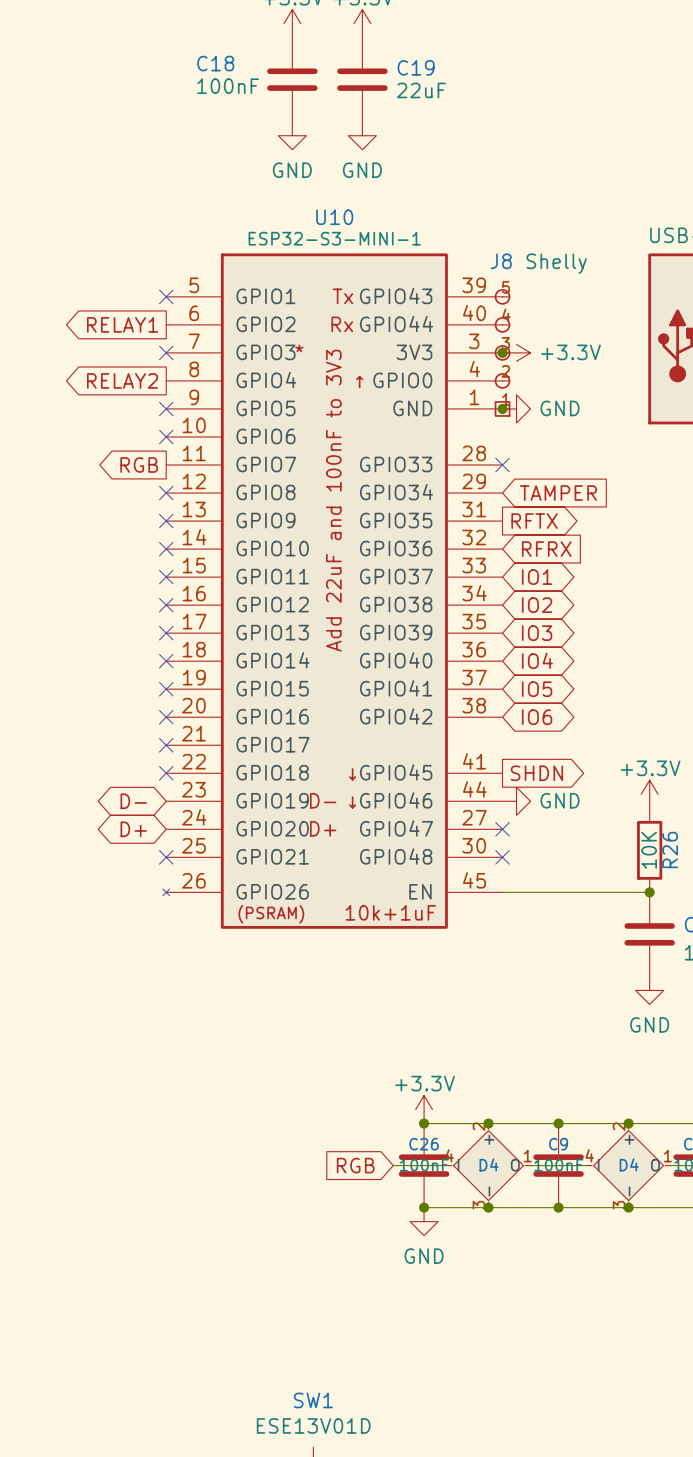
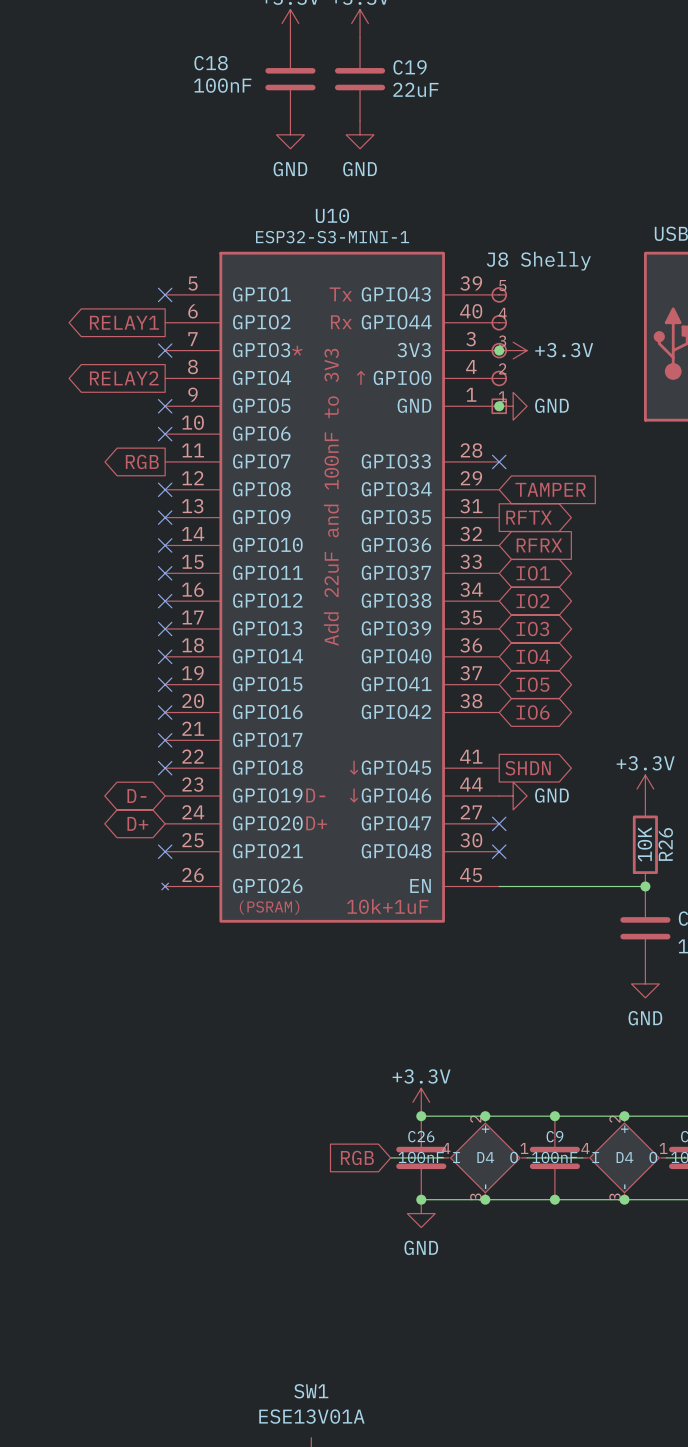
SW1 value: ESE13V01D (313, 1425) -> ESE13V01A (311, 1416)

